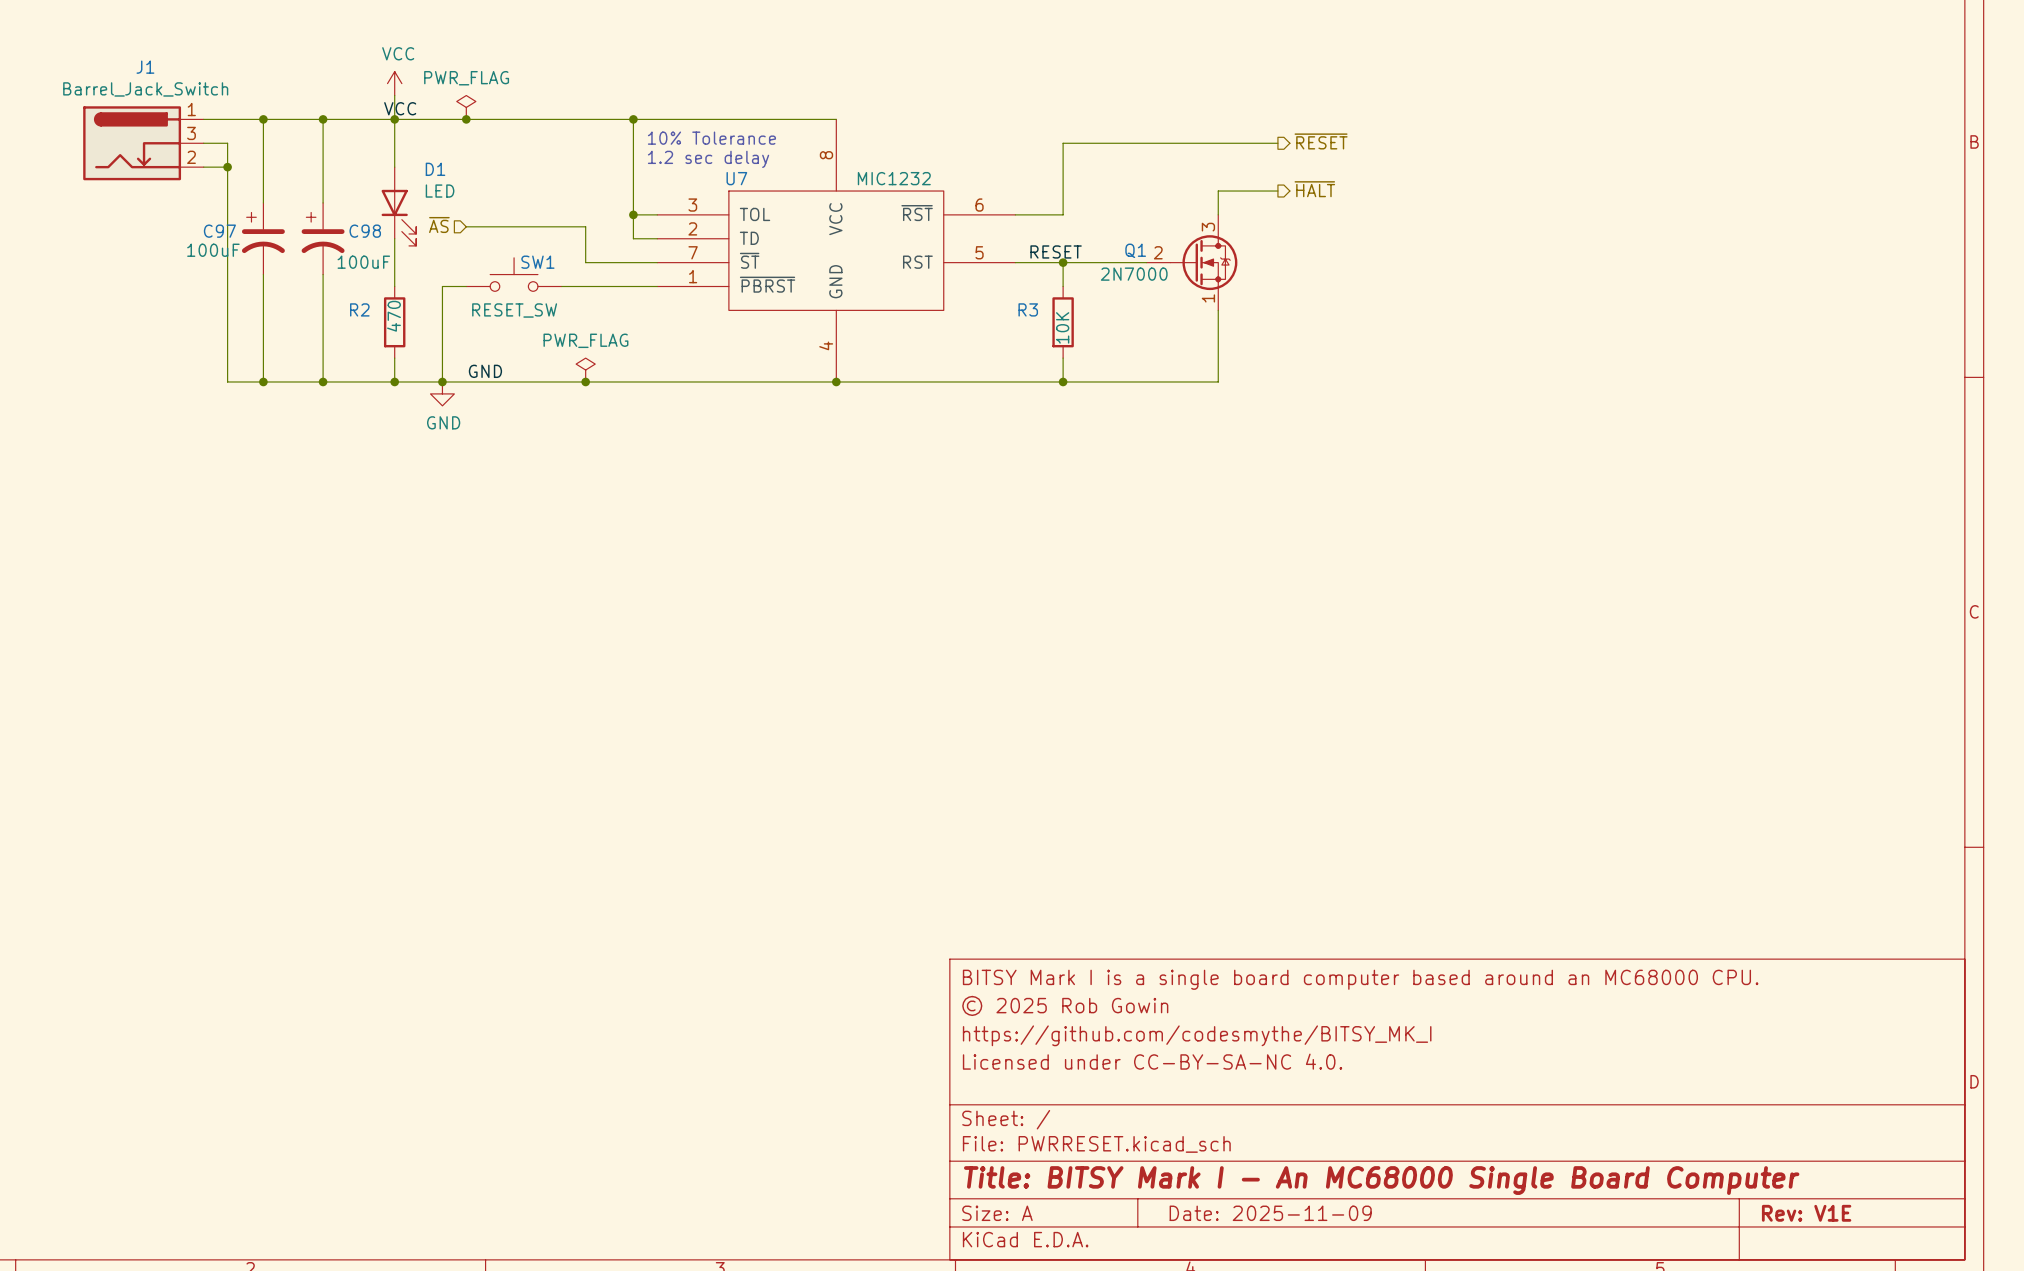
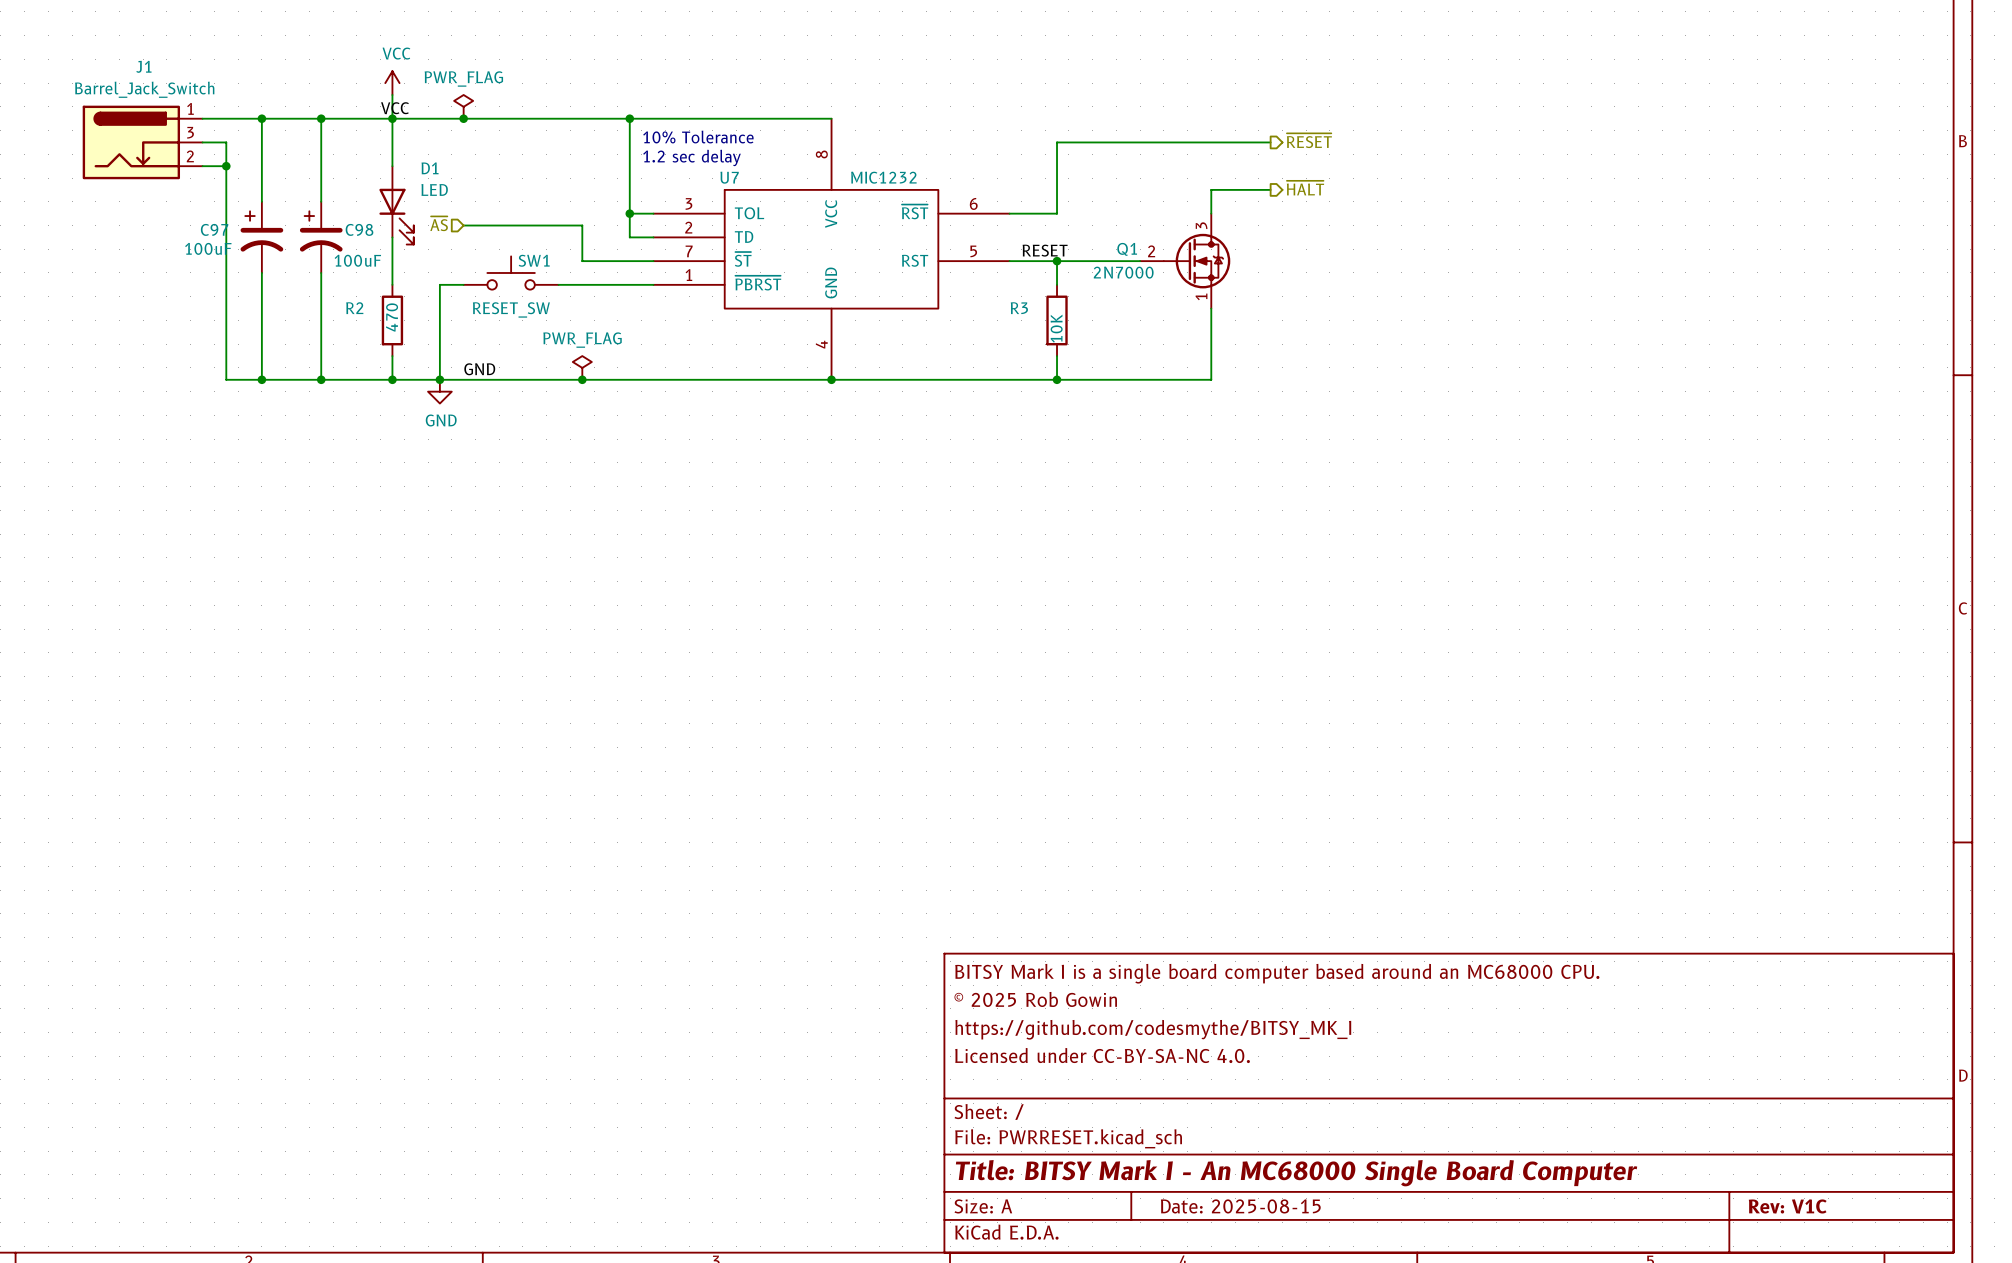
title block: Date: 2025-11-09 (1270, 1213) -> Date: 2025-08-15 (1240, 1206)
title block: Rev: V1E (1806, 1213) -> Rev: V1C (1787, 1206)

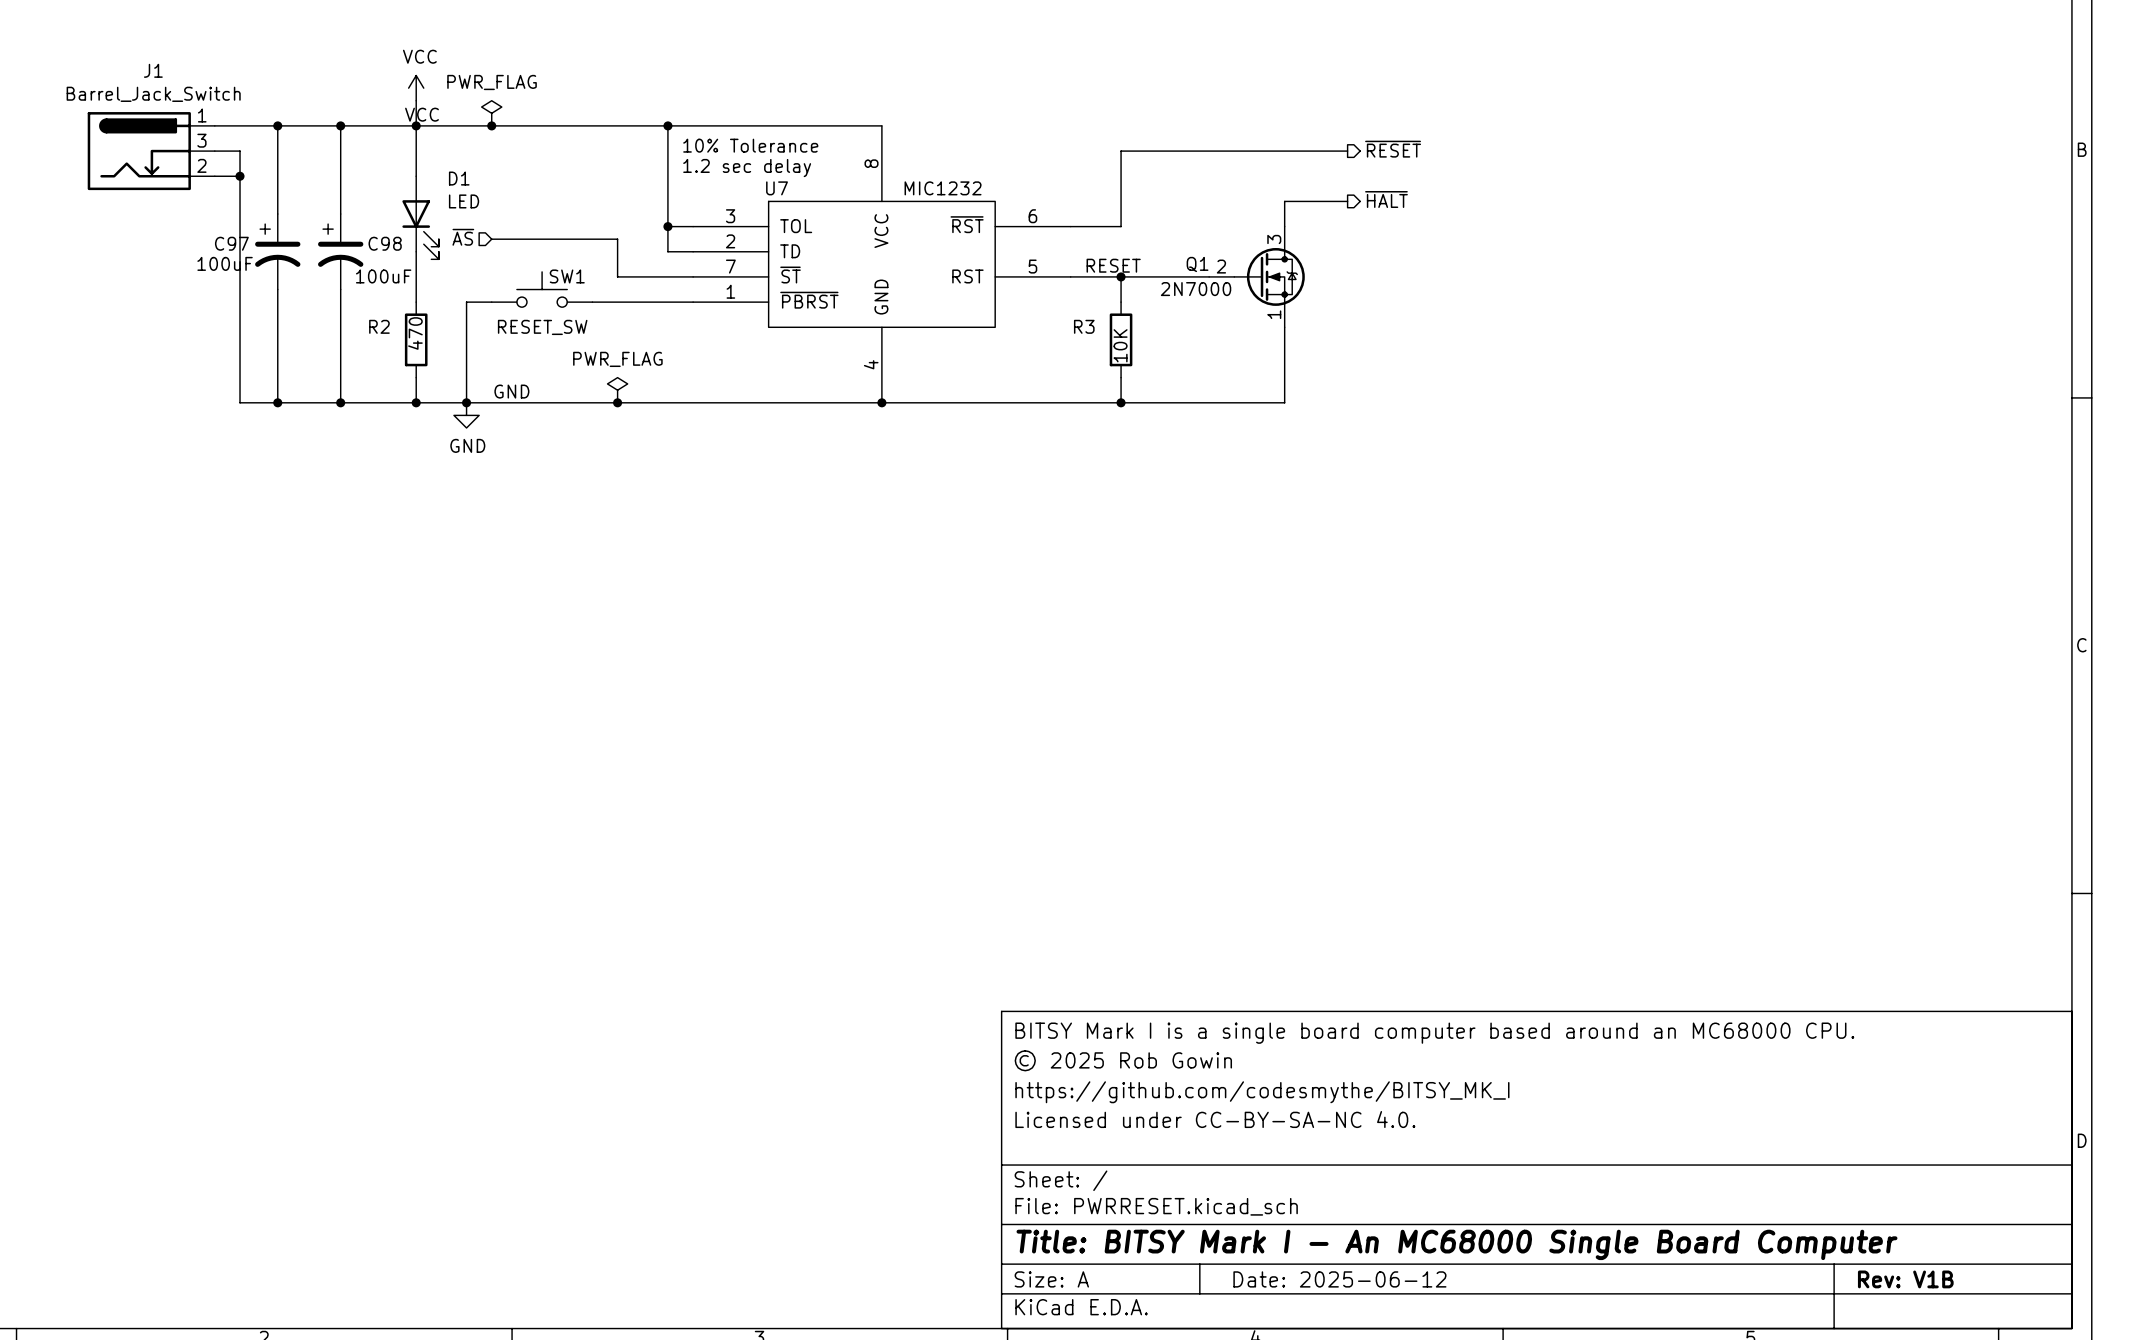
title block: Date: 2025-08-15 (1240, 1206) -> Date: 2025-06-12 (1339, 1279)
title block: Rev: V1C (1787, 1206) -> Rev: V1B (1905, 1279)

